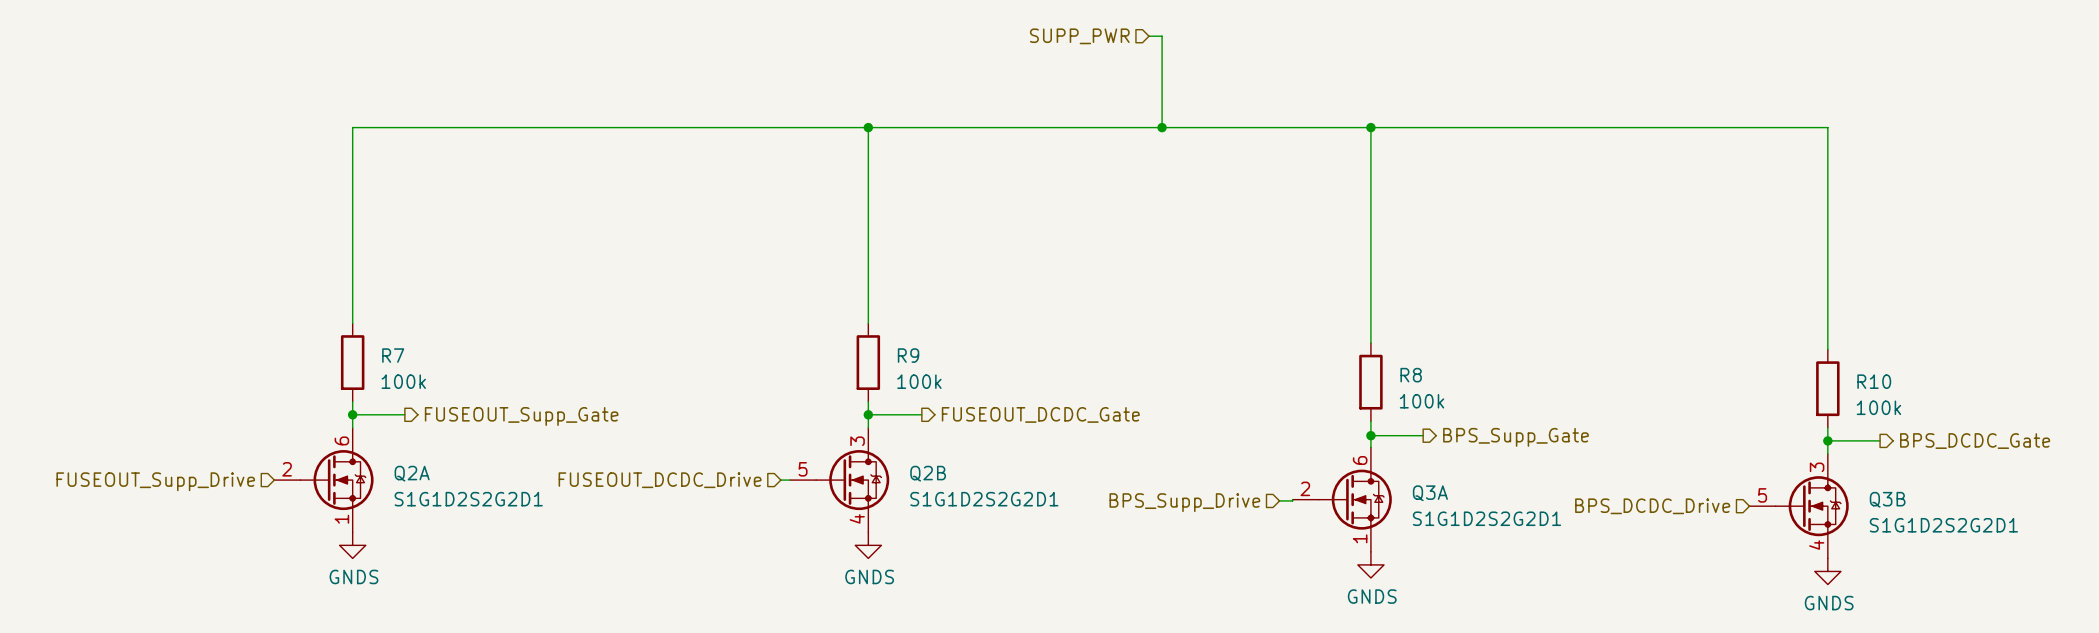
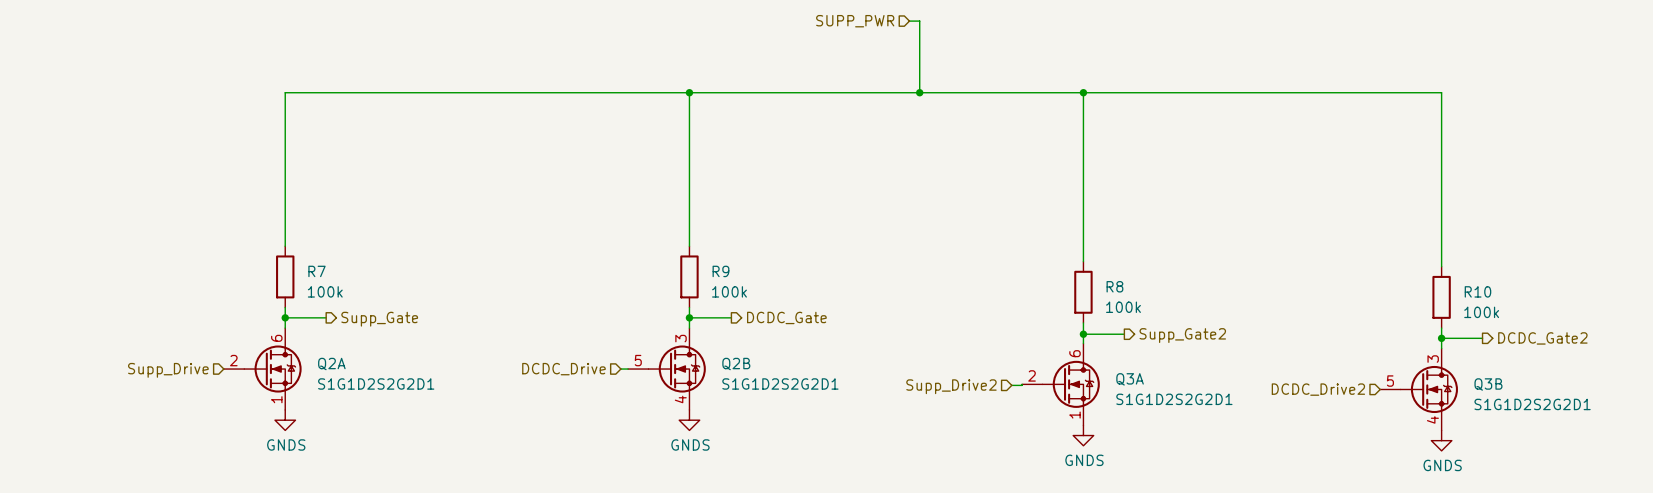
hierarchical label: FUSEOUT_DCDC_Gate (1040, 414) -> DCDC_Gate (786, 317)
hierarchical label: FUSEOUT_Supp_Gate (521, 416) -> Supp_Gate (379, 319)
hierarchical label: BPS_Supp_Gate (1515, 437) -> Supp_Gate2 (1182, 335)
hierarchical label: BPS_DCDC_Gate (1975, 441) -> DCDC_Gate2 (1542, 338)
hierarchical label: FUSEOUT_DCDC_Drive (660, 480) -> DCDC_Drive (563, 369)
hierarchical label: FUSEOUT_Supp_Drive (155, 481) -> Supp_Drive (168, 370)
hierarchical label: BPS_Supp_Drive (1184, 502) -> Supp_Drive2 (951, 386)
hierarchical label: BPS_DCDC_Drive (1652, 506) -> DCDC_Drive2 (1318, 389)

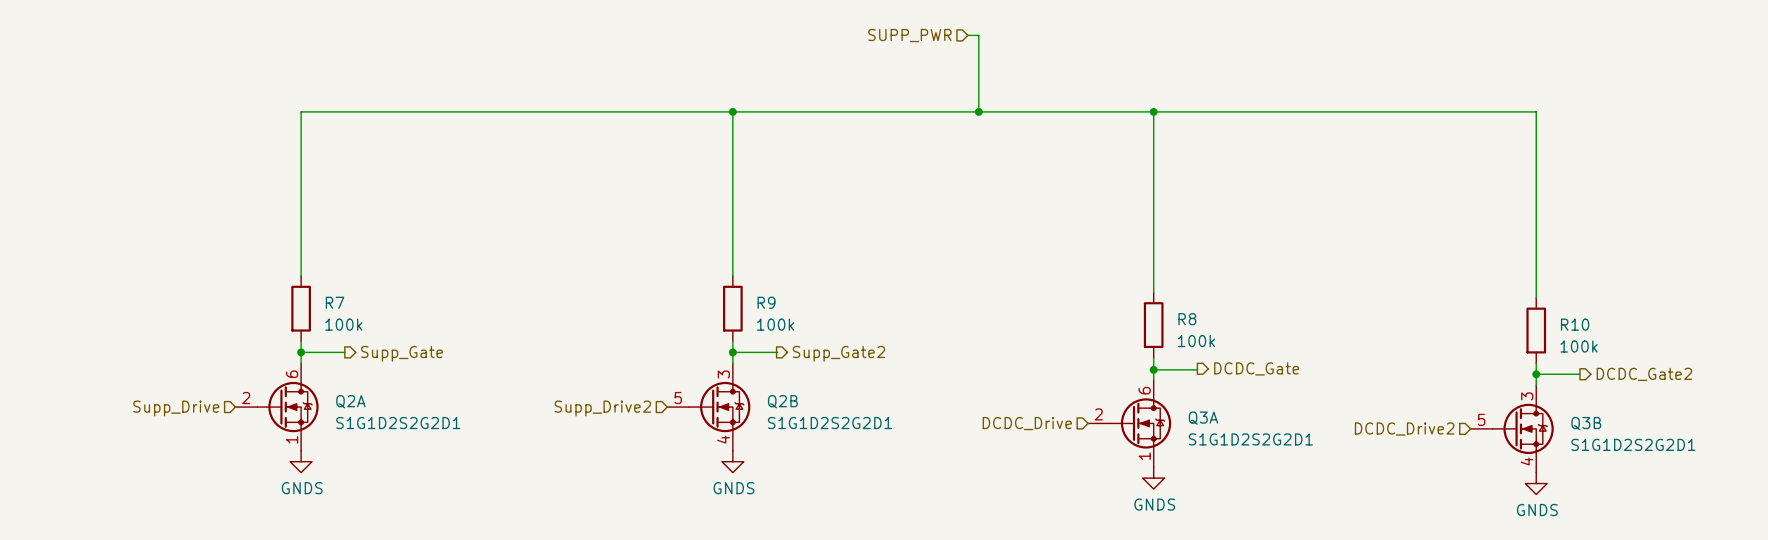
hierarchical label: DCDC_Gate (786, 317) -> Supp_Gate2 (838, 353)
hierarchical label: Supp_Gate2 (1182, 335) -> DCDC_Gate (1256, 368)
hierarchical label: DCDC_Drive (563, 369) -> Supp_Drive2 (602, 408)
wire: (620, 369) (628, 369) -> none
hierarchical label: none -> DCDC_Drive (1027, 423)
wire: (1022, 384) (1011, 385) -> none
hierarchical label: Supp_Drive2 (951, 386) -> none

